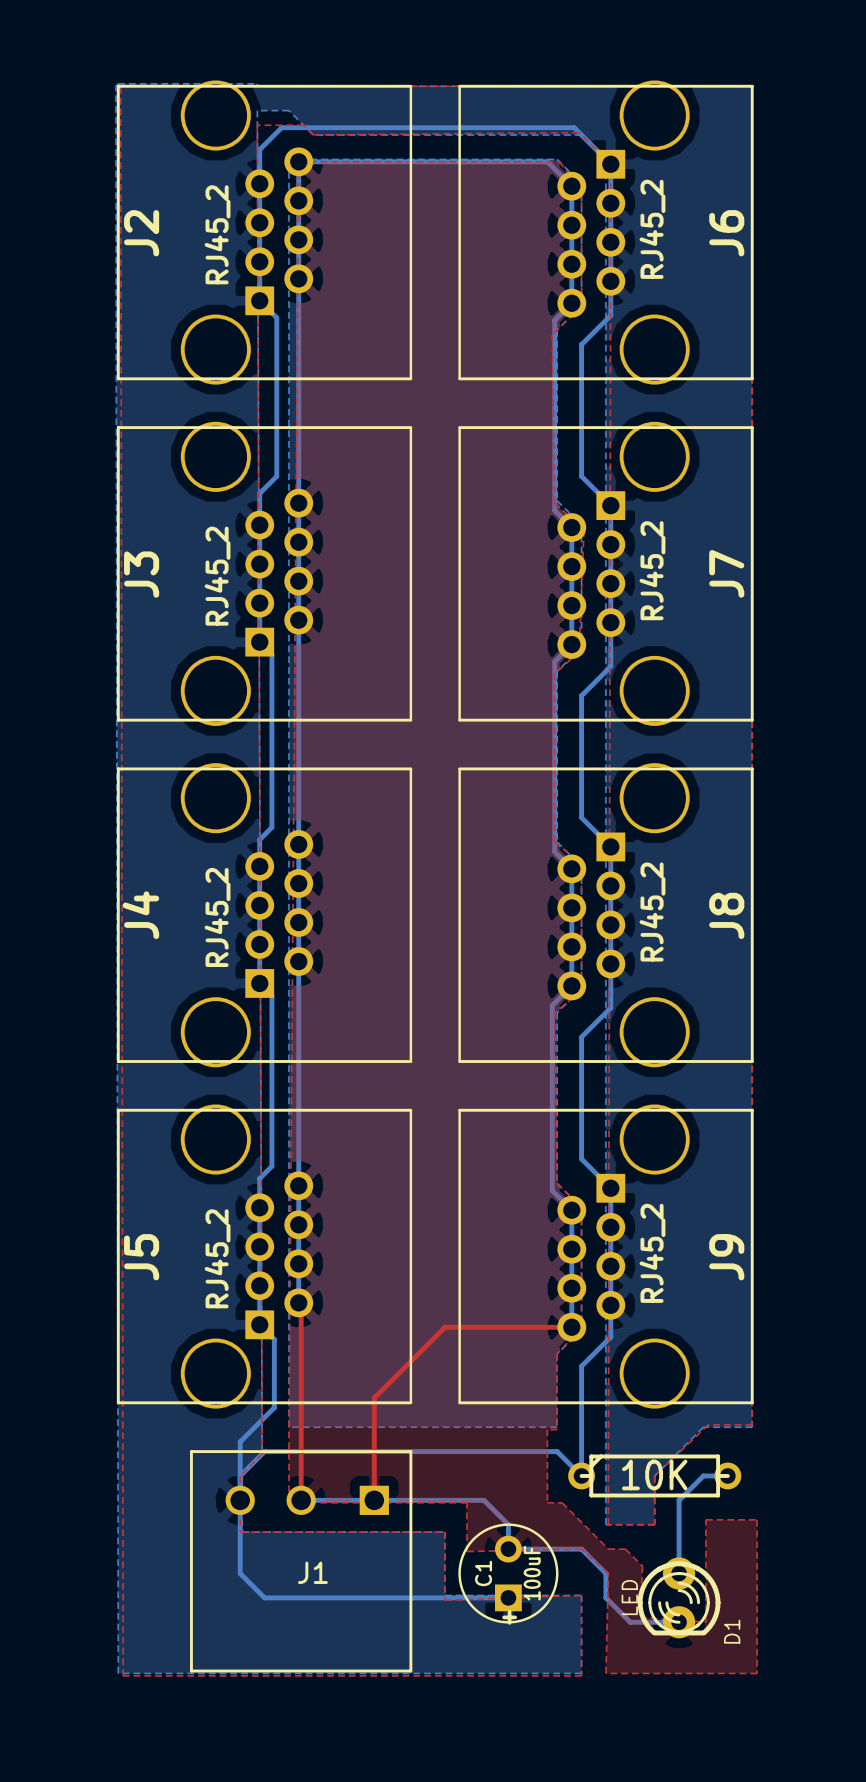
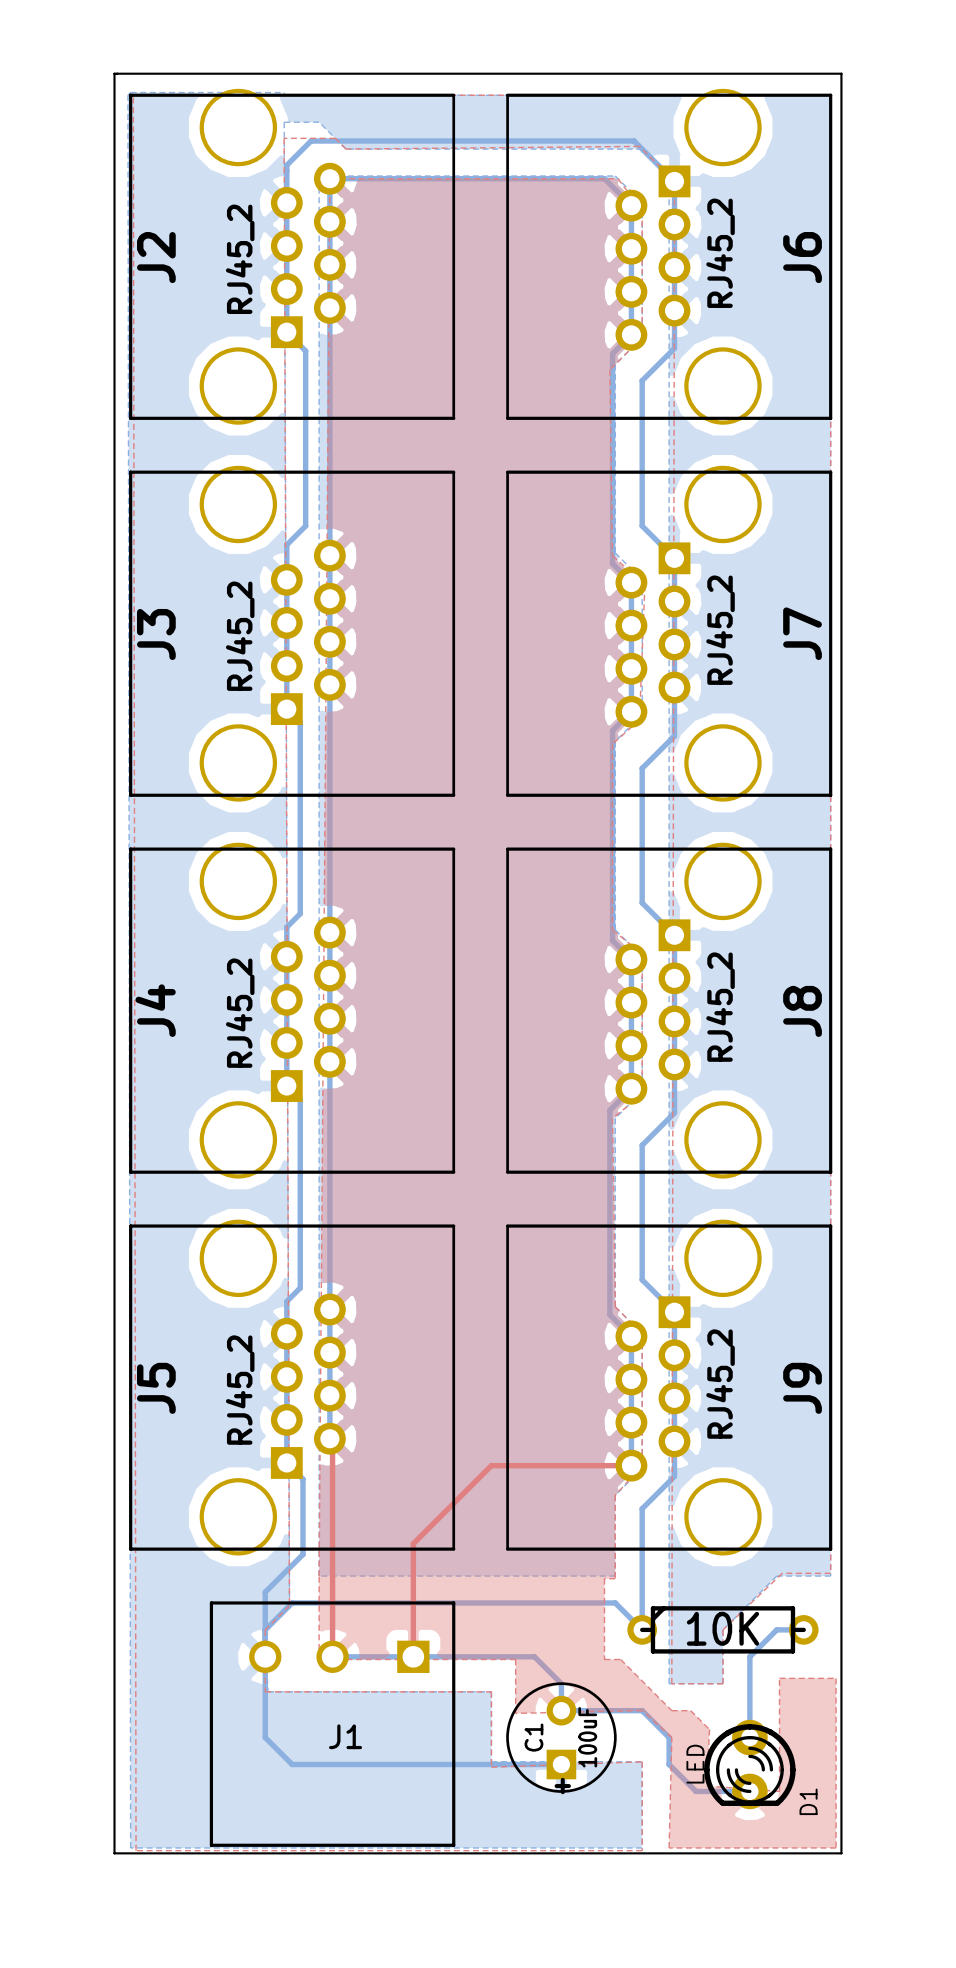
board edge: none -> (114, 73) (841, 73) (841, 1853) (114, 1853) (114, 73)

